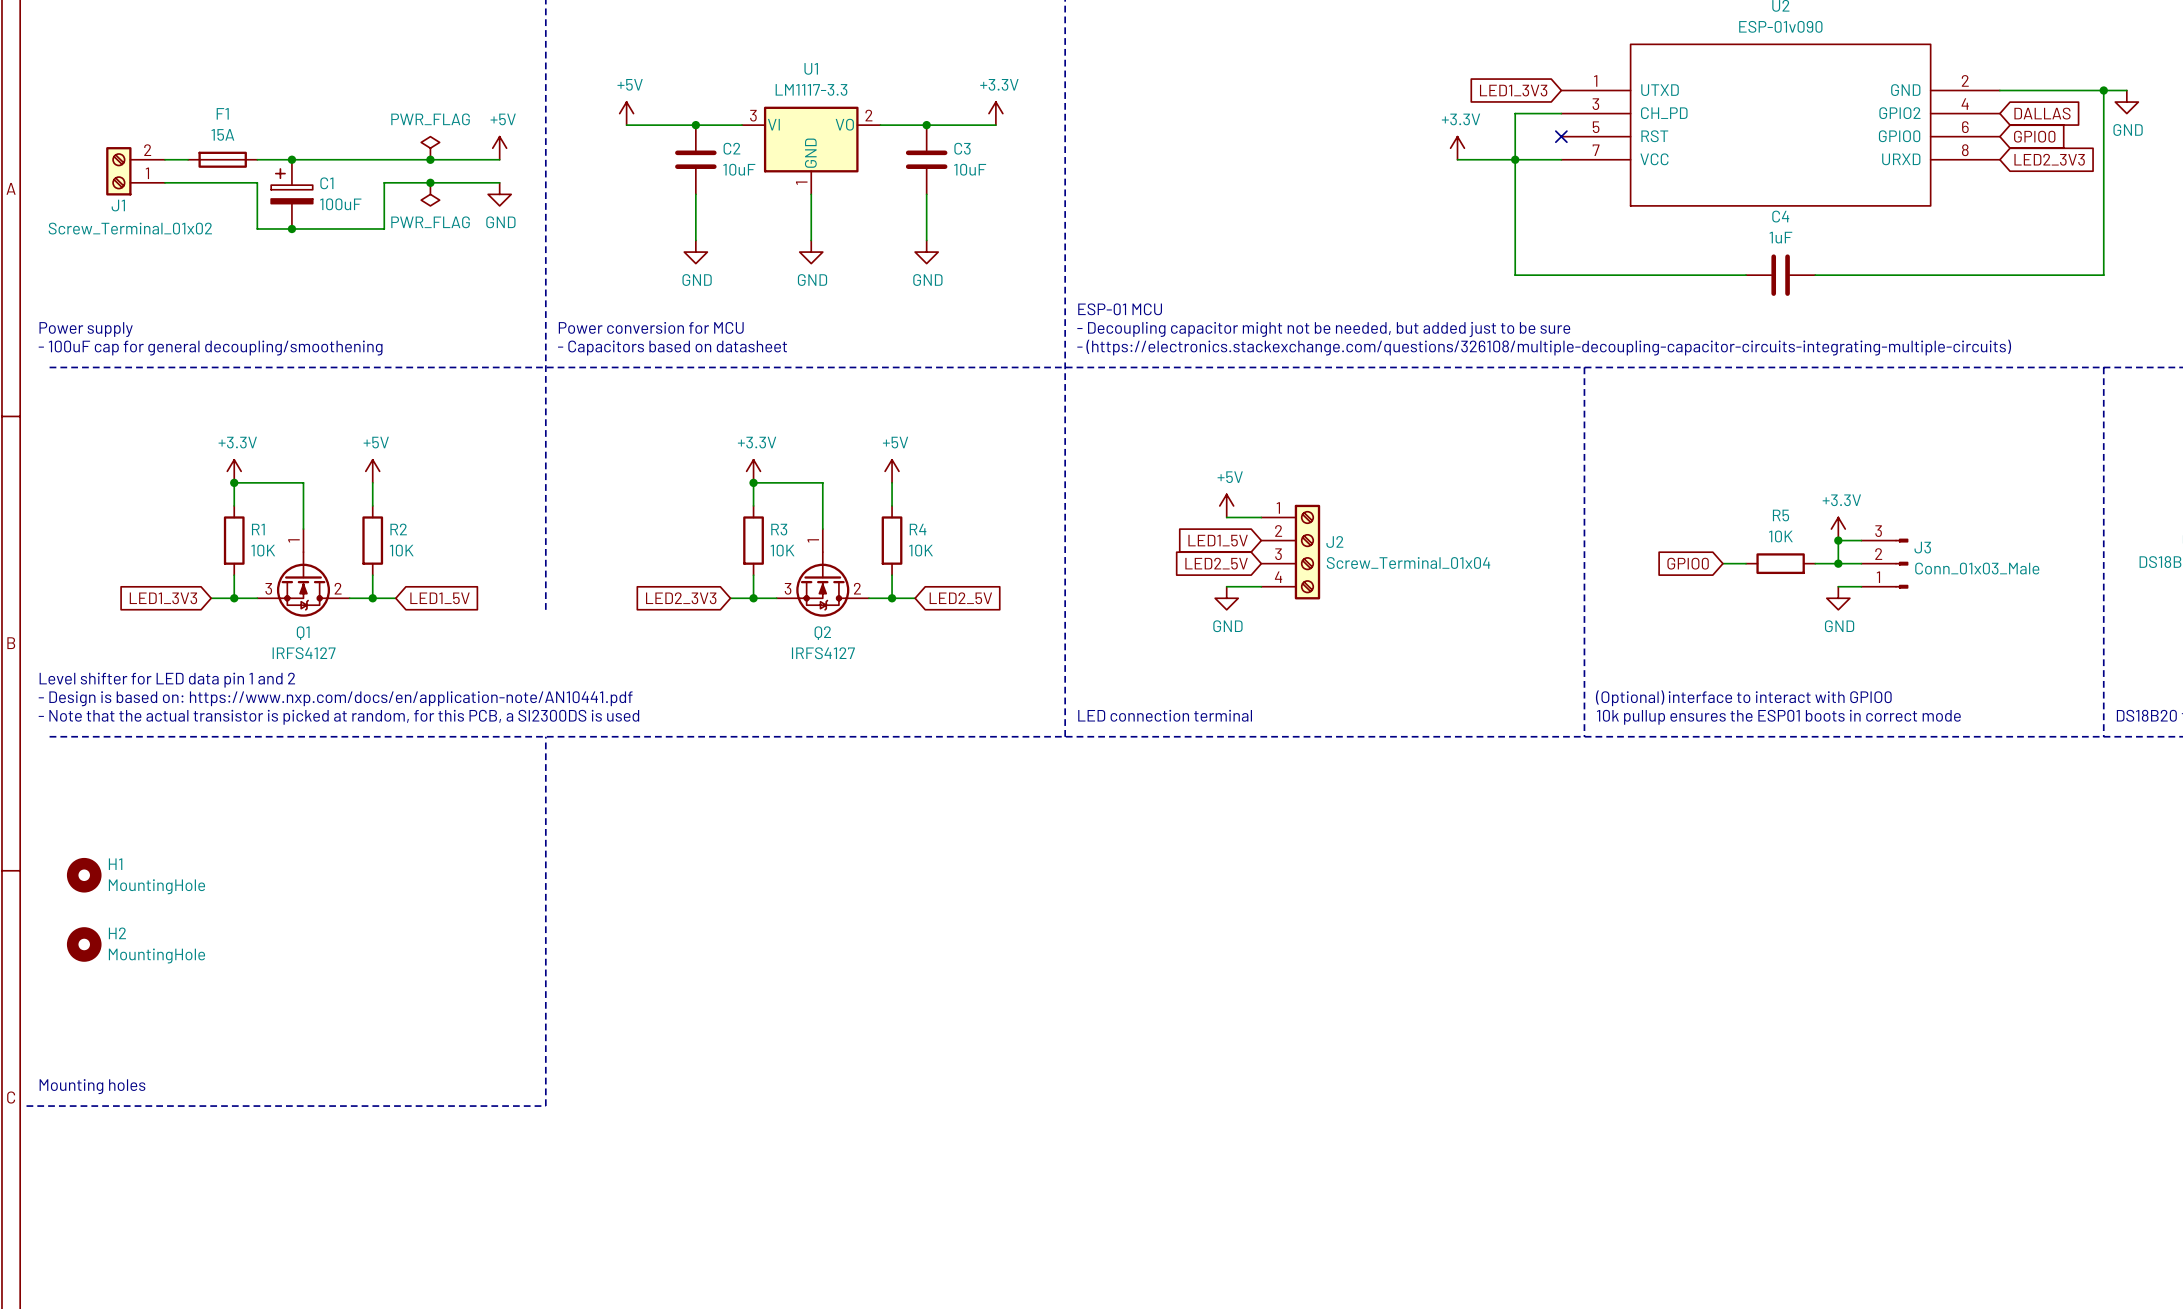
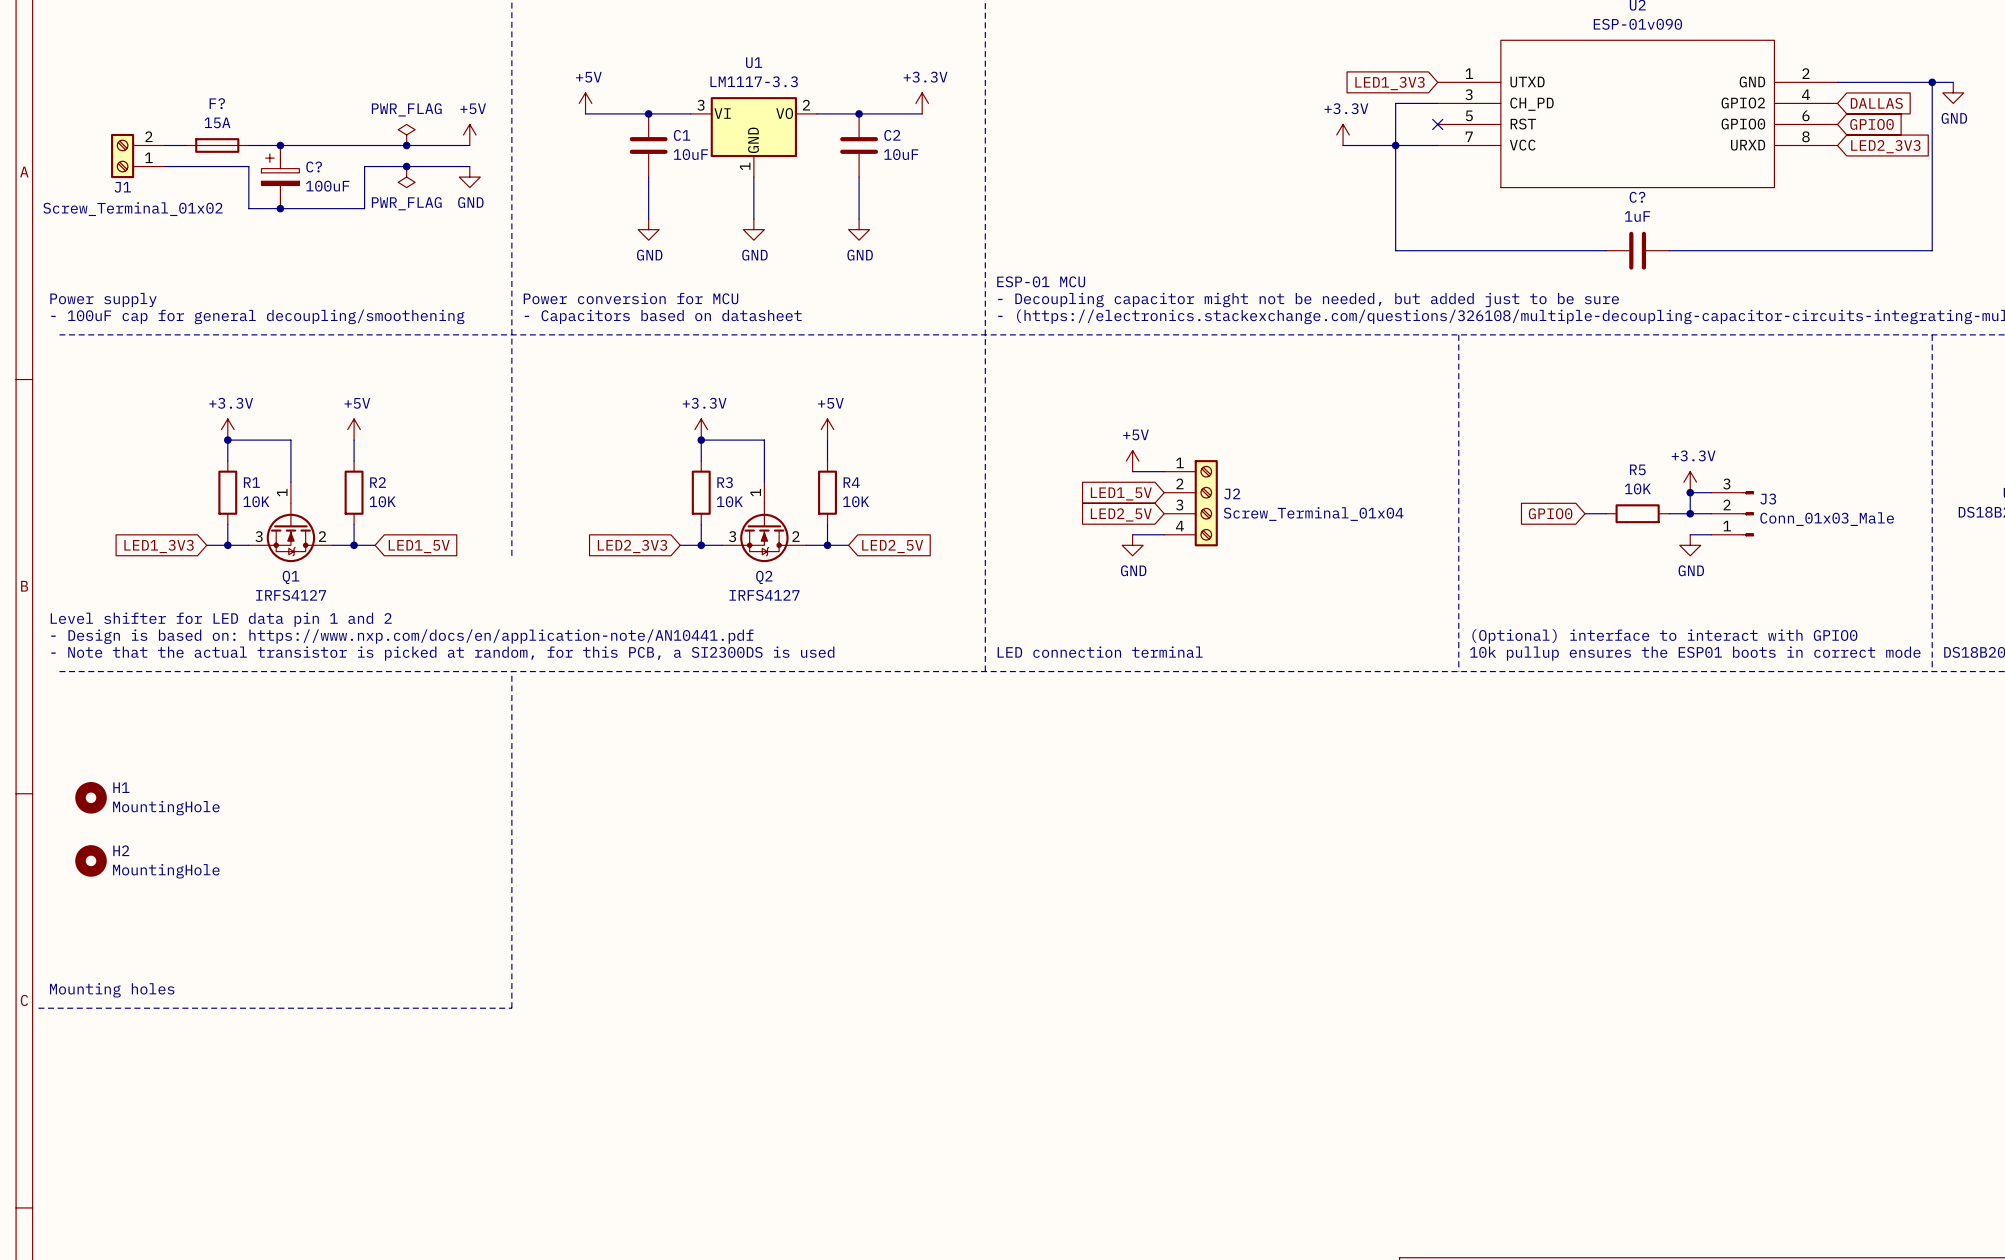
F1 name: F1 (222, 113) -> F? (217, 103)
C2 name: C2 (731, 148) -> C1 (682, 135)
C3 name: C3 (962, 148) -> C2 (892, 135)
C1 name: C1 (326, 183) -> C? (314, 166)
C4 name: C4 (1780, 216) -> C? (1637, 197)

